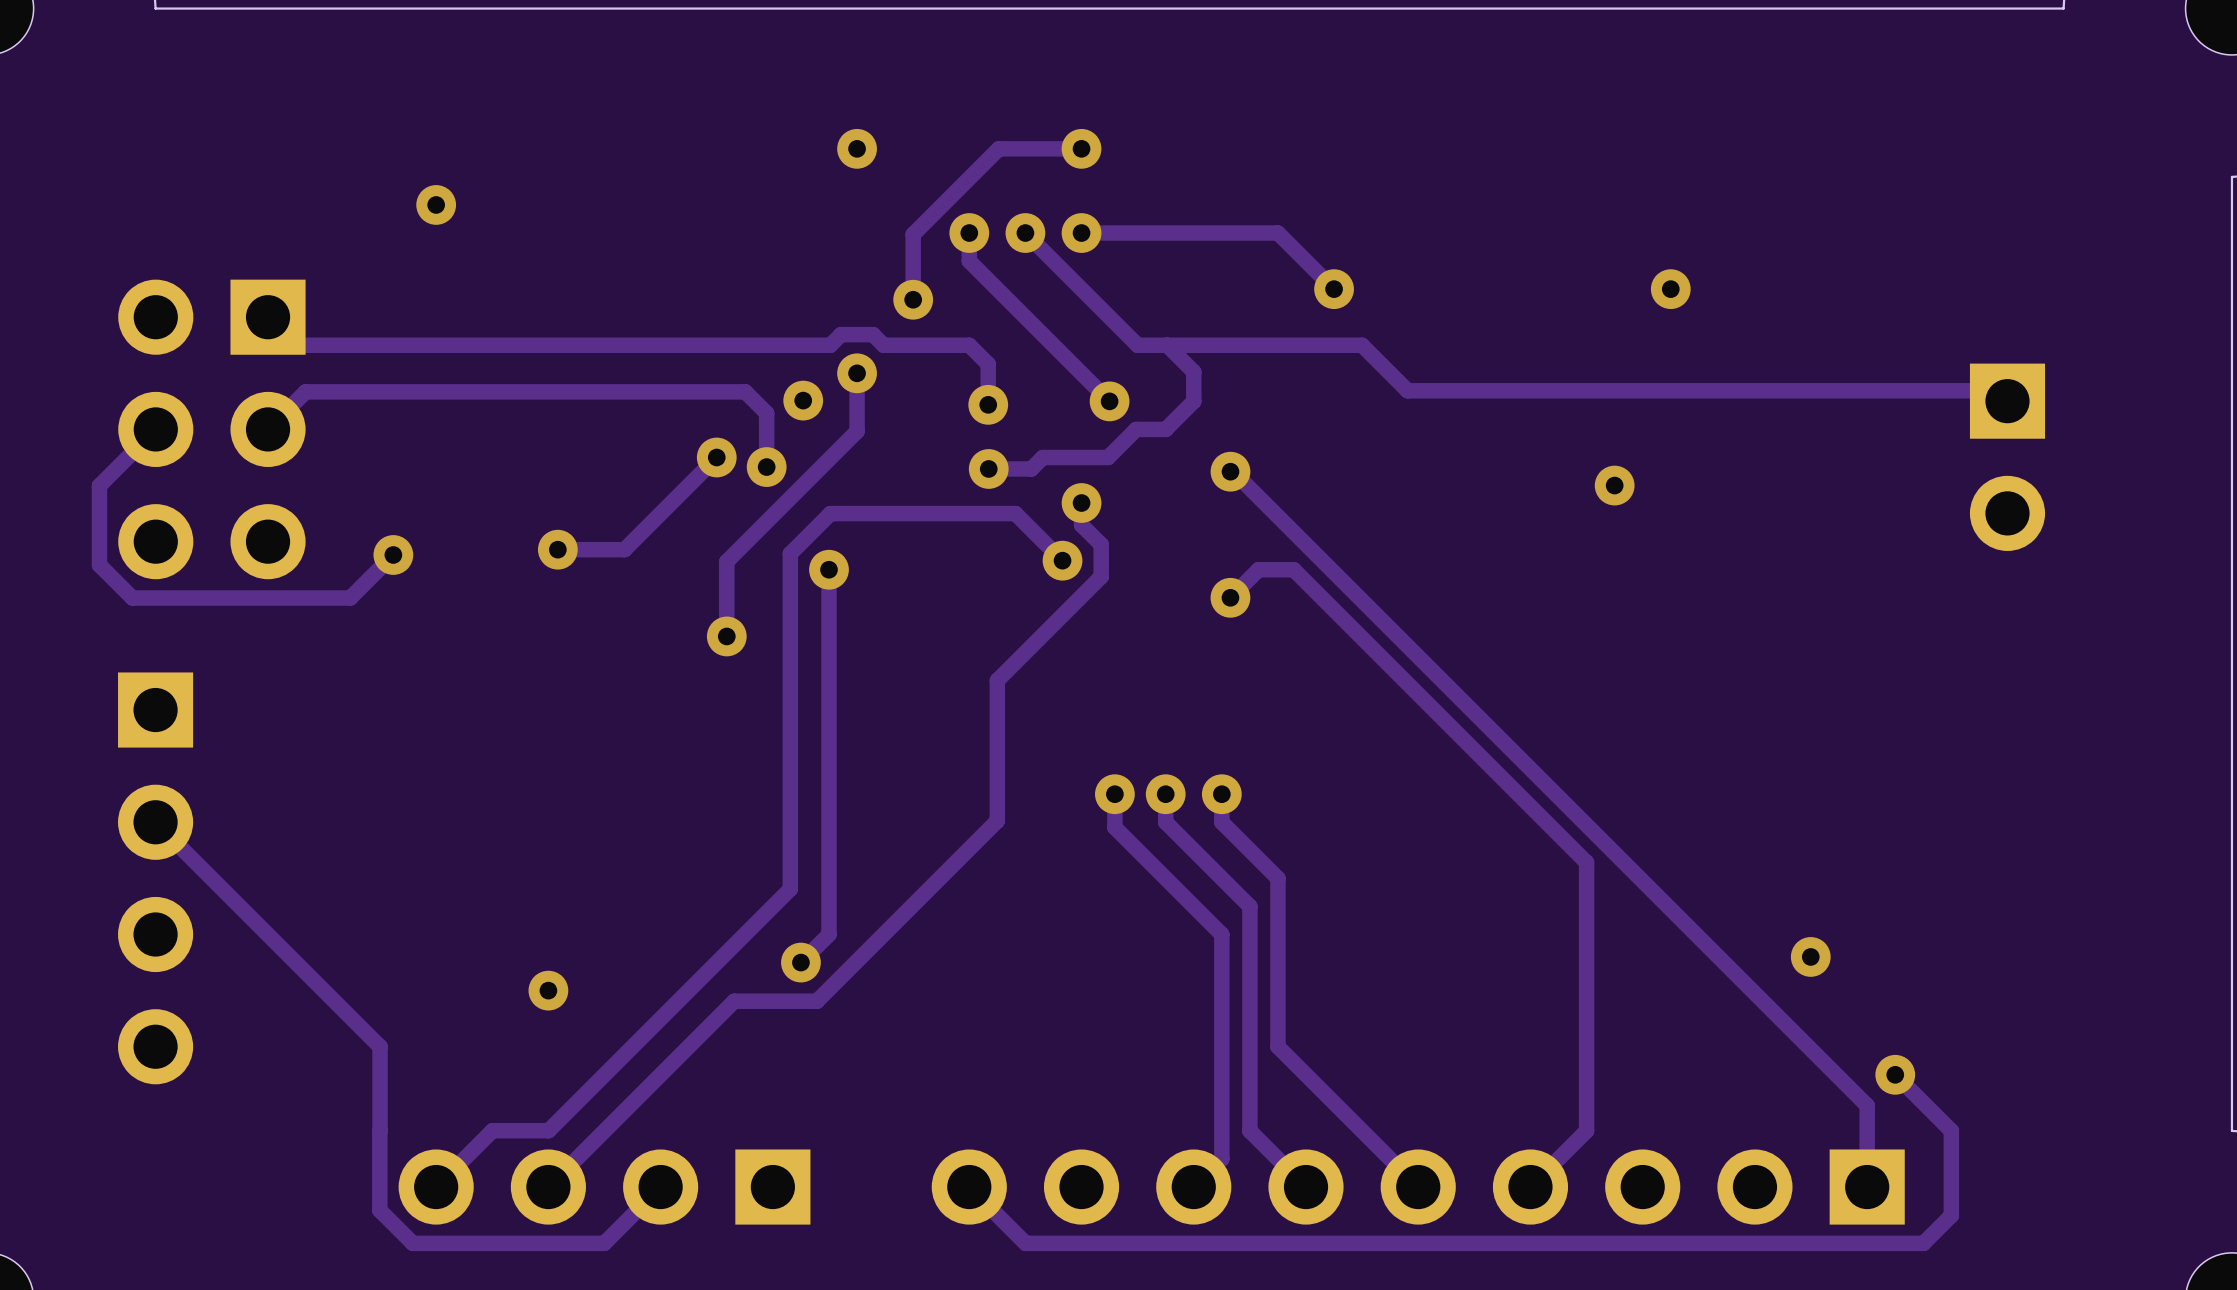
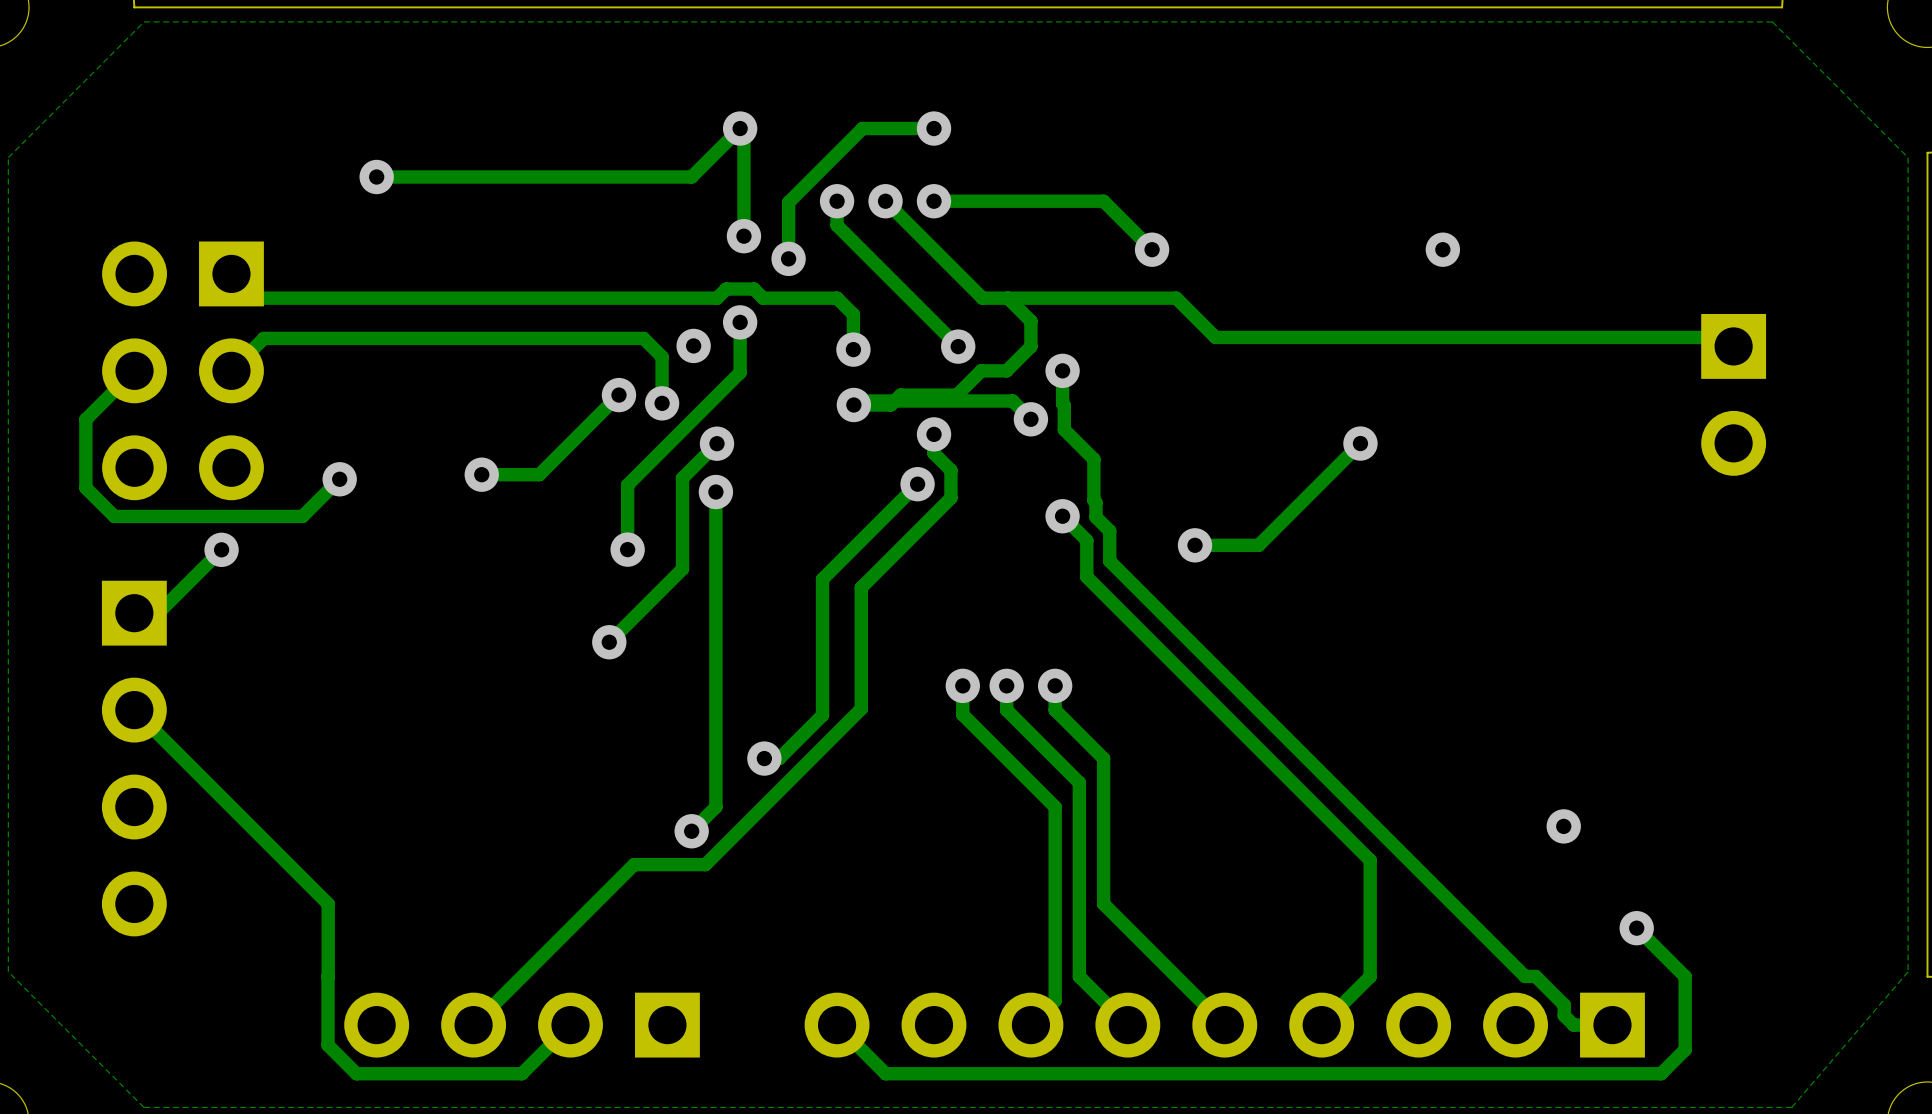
zone outline: none -> (1772, 21) (144, 21) (8, 157) (8, 971) (144, 1107) (1791, 1107) (1908, 971) (1908, 157) (1772, 21)
track: none -> (376, 177) (691, 177) (740, 128) (743, 132) (743, 236)
via: none -> (743, 236)
via: none -> (1062, 370)
track: none -> (853, 404) (857, 401) (1012, 401) (1030, 419)
track: (1230, 471) (1233, 471) (1867, 1105) (1867, 1187) -> (1062, 370) (1064, 429) (1093, 459) (1095, 517) (1109, 530) (1109, 561) (1525, 976) (1535, 976) (1564, 1004) (1564, 1015) (1573, 1025) (1612, 1025)
via position: (1230, 471) -> (1030, 419)
via position: (1614, 485) -> (1360, 443)
track: (830, 513) (1015, 513) (1062, 560) -> (764, 758) (779, 758) (822, 715) (822, 579) (917, 484)
via: none -> (717, 443)
track: none -> (1360, 443) (1258, 545) (1195, 545)
track: (1230, 597) (1258, 569) (1293, 569) (1586, 862) (1586, 996) -> (1062, 516) (1086, 540) (1086, 576) (1370, 860)
via: none -> (1195, 545)
track: none -> (221, 549) (158, 613) (134, 613)
via: none -> (221, 549)
track: (790, 658) (790, 888) (548, 1130) (492, 1130) (436, 1187) -> (682, 569) (609, 642)
via: none -> (609, 642)
via: none -> (764, 758)
via: (548, 990) -> none

